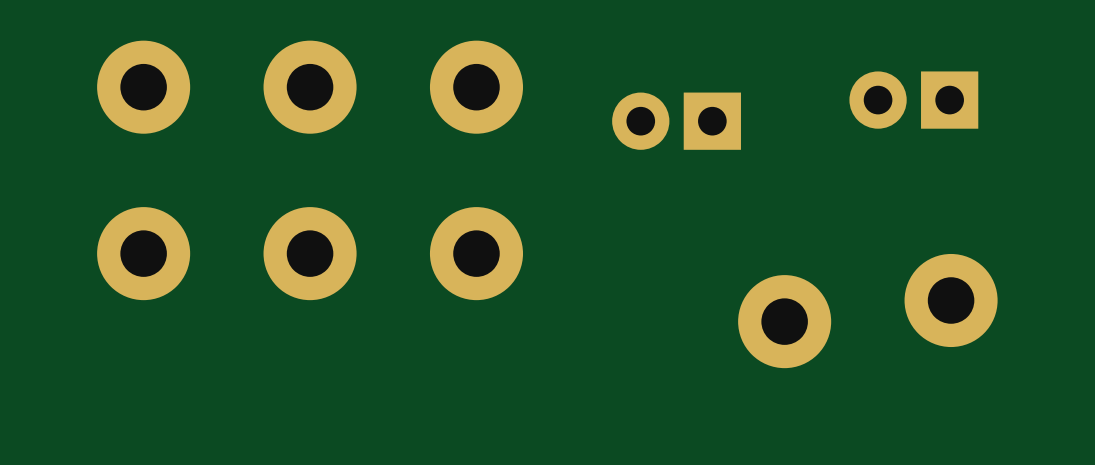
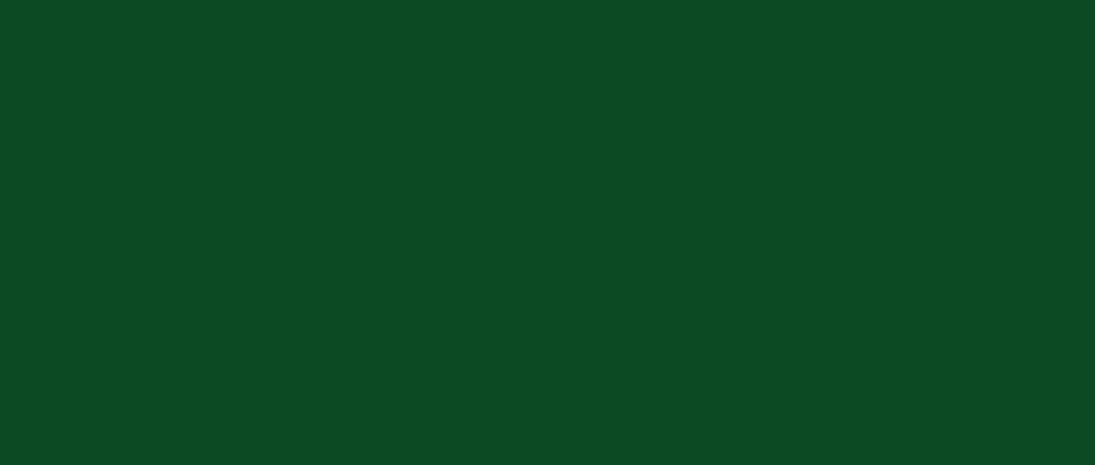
part: (143, 87) -> none
part: (310, 87) -> none
part: (476, 87) -> none
part: (913, 100) -> none
part: (676, 121) -> none
part: (143, 253) -> none
part: (310, 253) -> none
part: (476, 253) -> none
part: (951, 300) -> none
part: (784, 321) -> none

